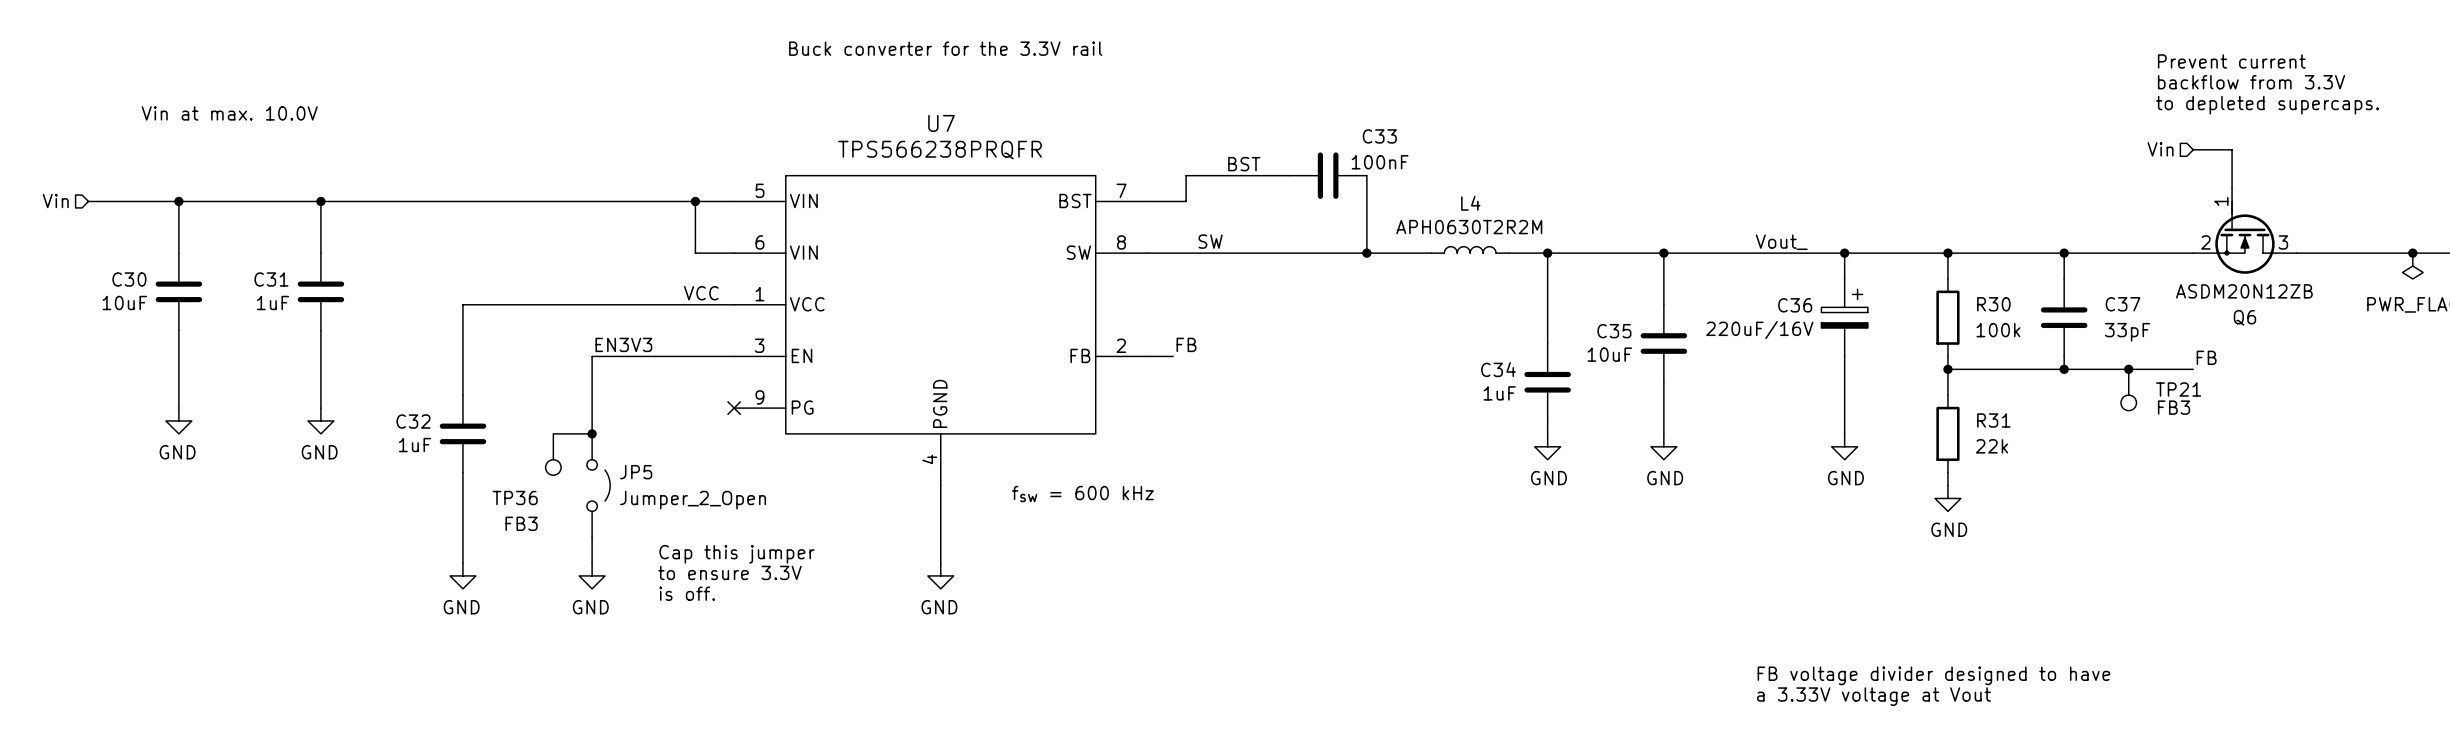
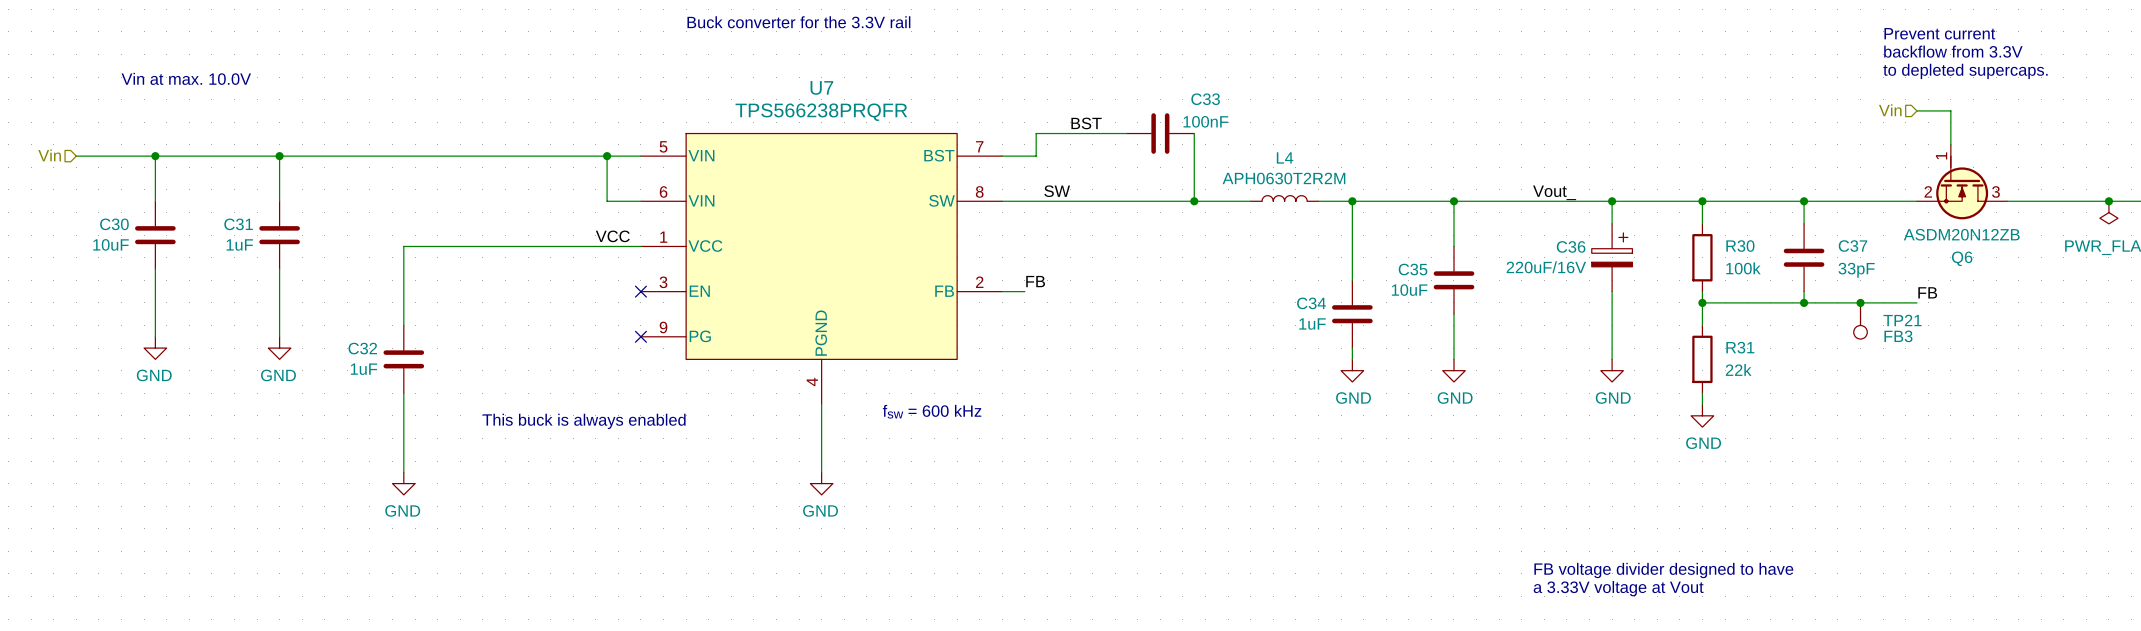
label: EN3V3 (623, 344) -> none
wire: (734, 356) (592, 356) (592, 433) (553, 433) -> none
no-connect mark: none -> (640, 291)
junction: (592, 433) -> none
TP36: FB3 (553, 454) -> none
JP5: Jumper_2_Open (598, 485) -> none
text: none -> This buck is always enabled (584, 421)
wire: (592, 537) (592, 563) -> none
text: Cap this jumper (737, 554) -> none
text: to ensure 3.3V (729, 572) -> none
power symbol: GND (592, 575) -> none
text: is off. (687, 593) -> none

